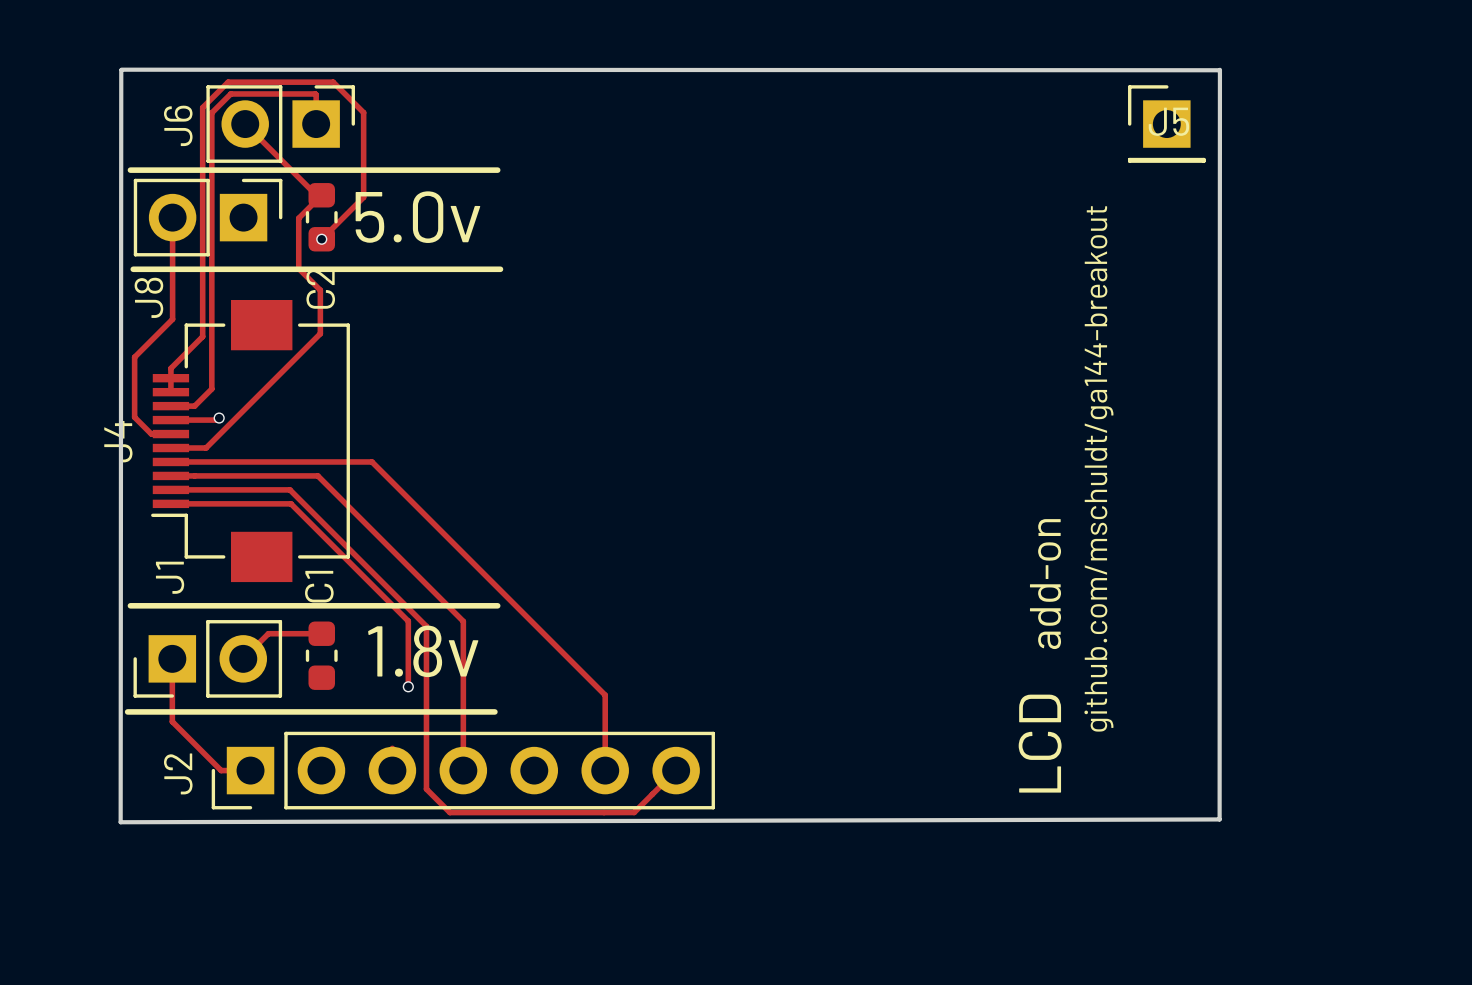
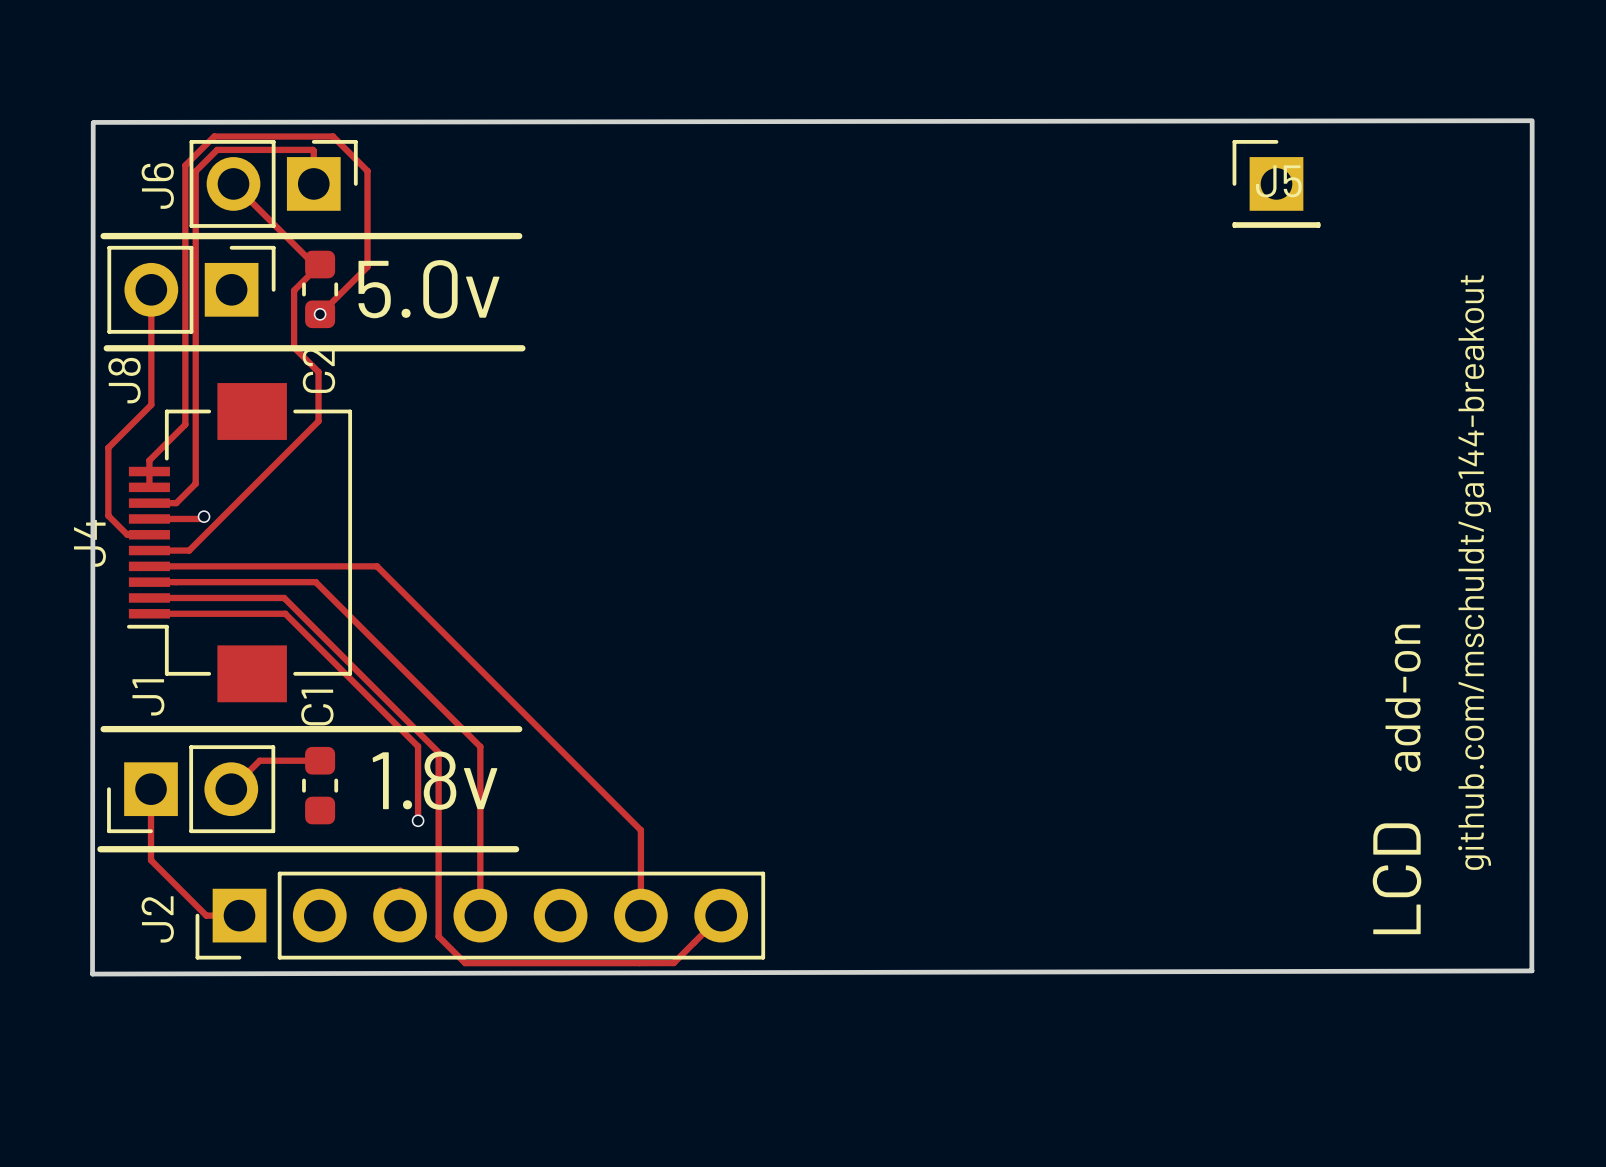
board edge: (121, 69) (1219, 70) -> (93, 122) (1532, 120)
board edge: (1219, 69) (1219, 819) (120, 822) -> (1532, 970) (92, 974)
board edge: none -> (1532, 122) (1531, 970)
text position: github.com/mschuldt/ga144-breakout (1098, 468) -> github.com/mschuldt/ga144-breakout (1474, 572)
text position: add-on (1045, 584) -> add-on (1403, 698)
text position: LCD (1040, 743) -> LCD (1397, 878)

